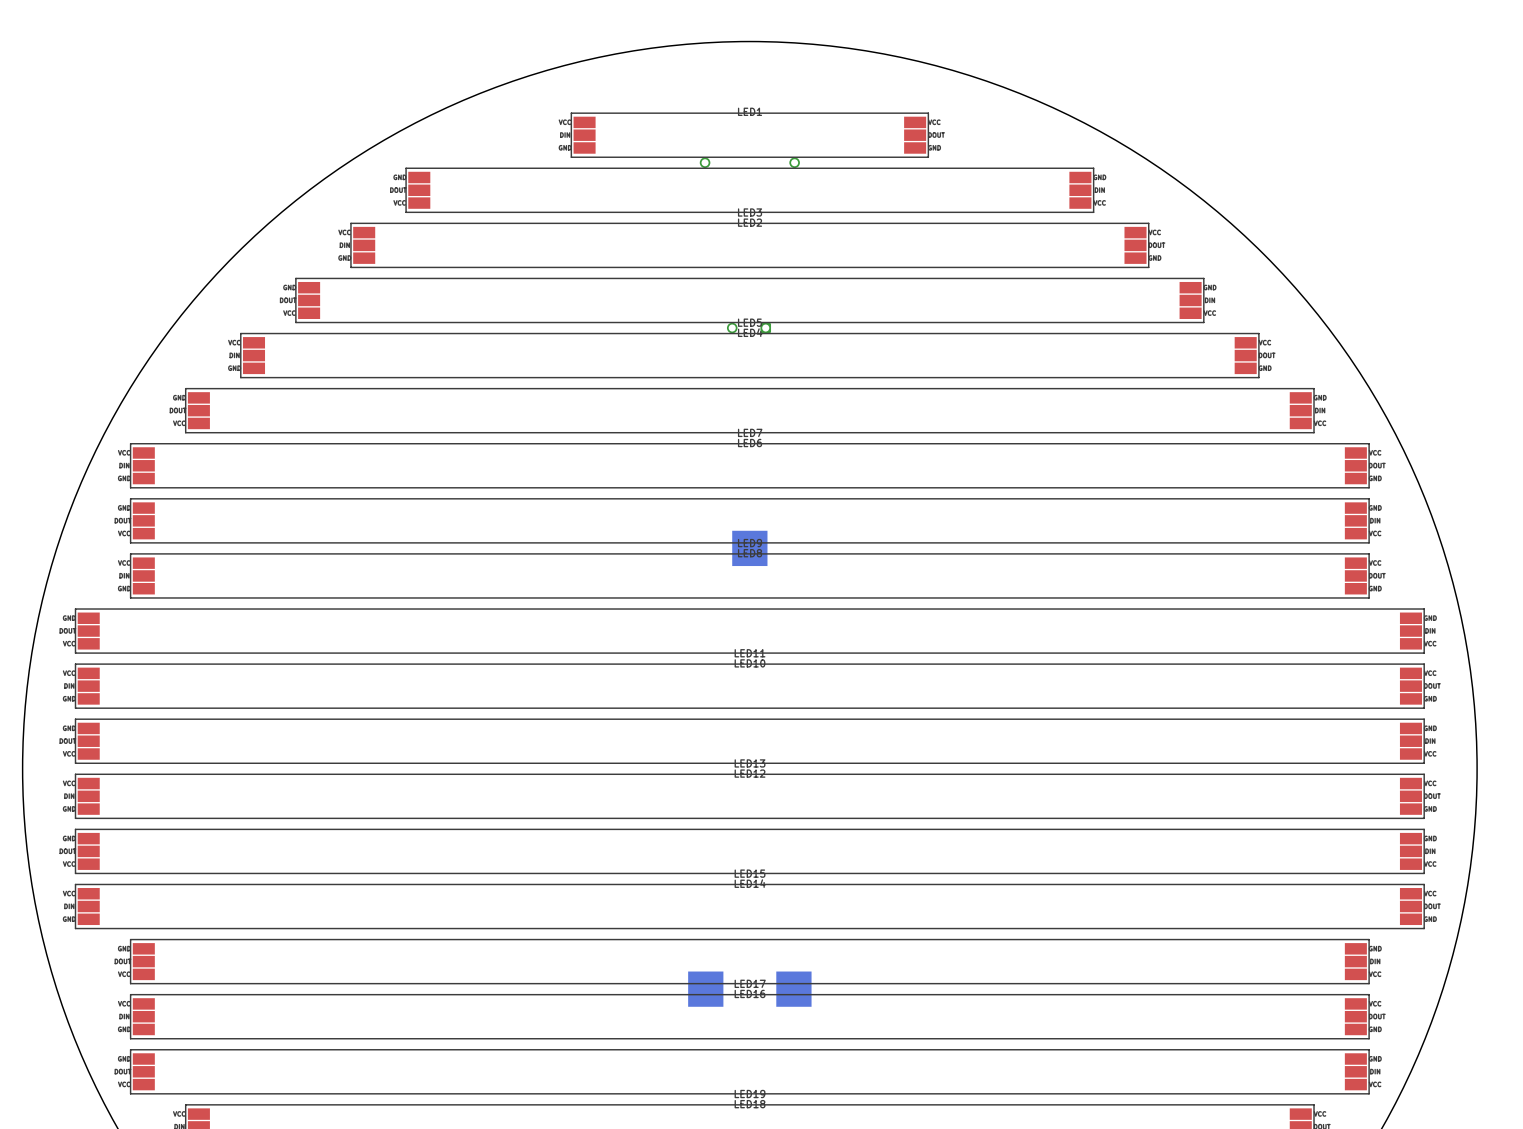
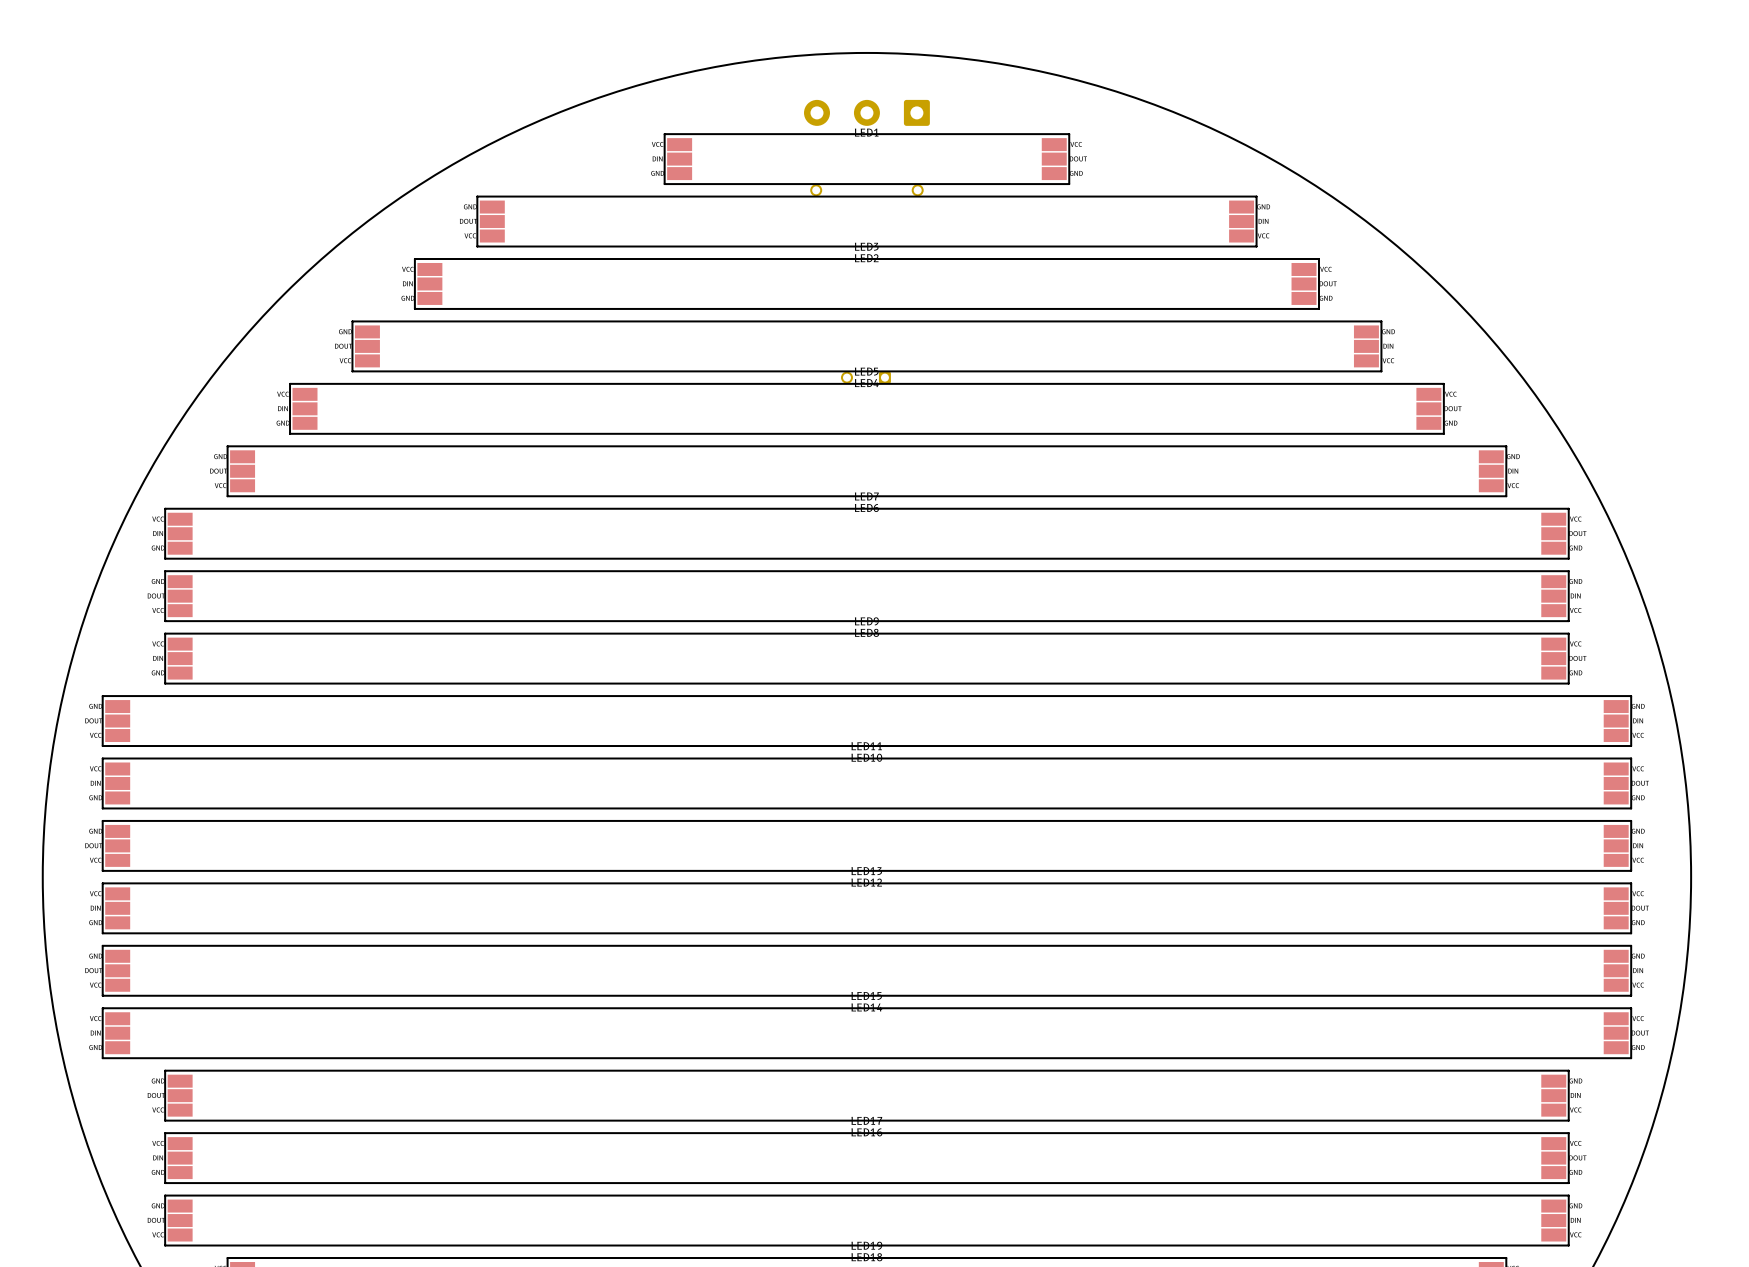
part: none -> (866, 112)
part: (749, 548) -> none
part: (705, 989) -> none
part: (793, 989) -> none

